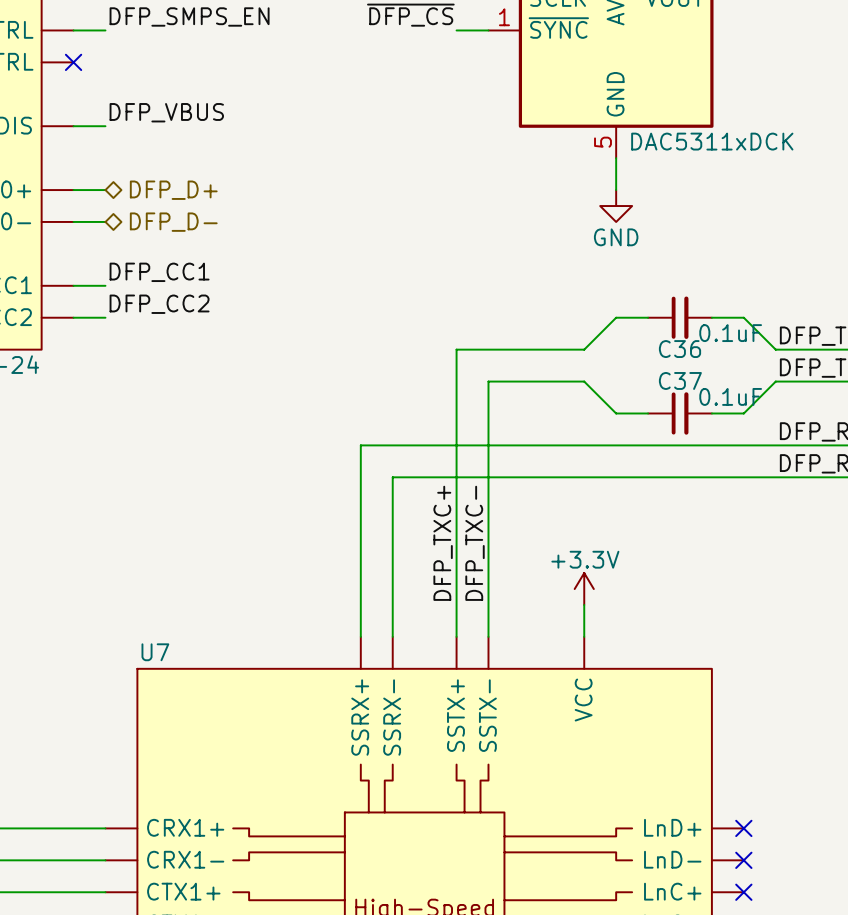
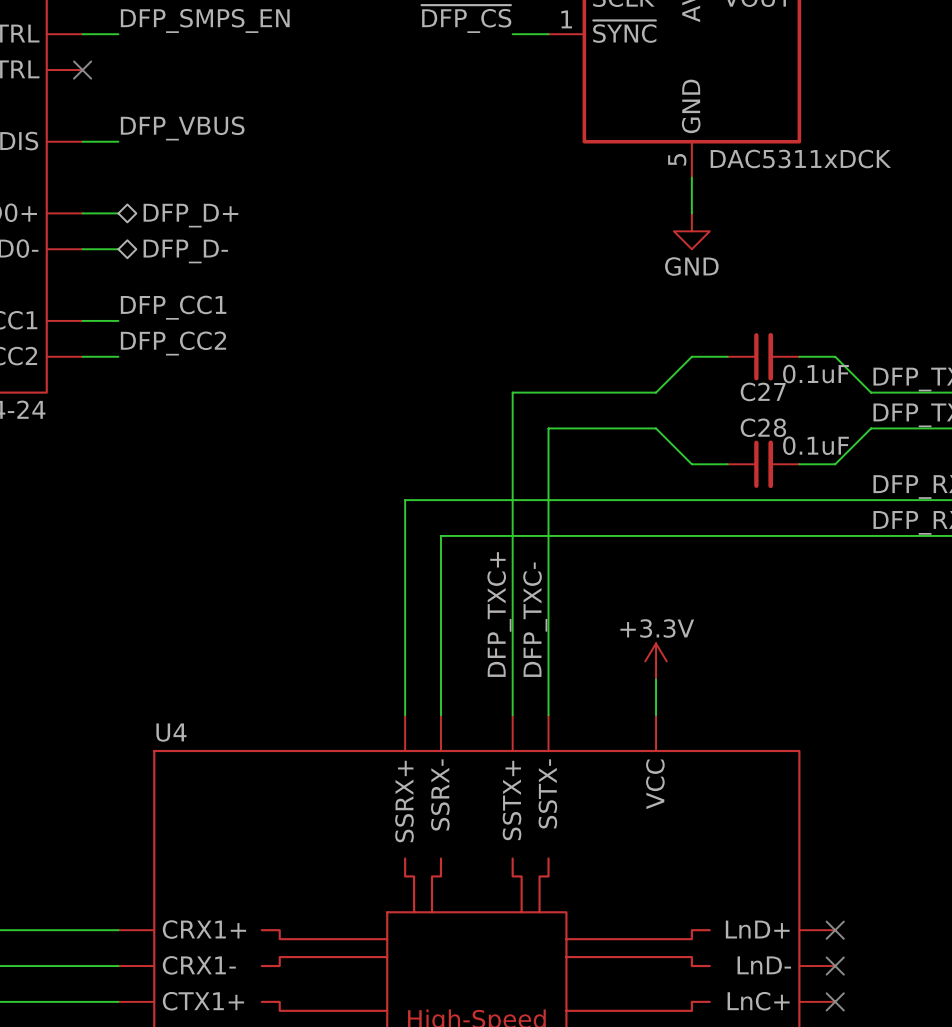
C36 name: C36 (680, 349) -> C27 (763, 391)
C37 name: C37 (680, 380) -> C28 (763, 427)
U7 name: U7 (155, 652) -> U4 (171, 732)

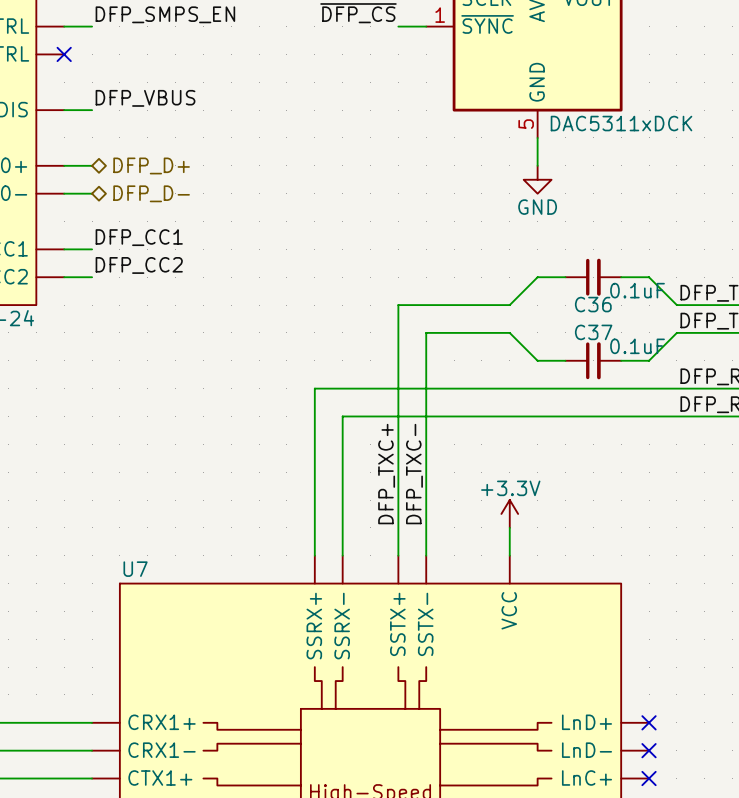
C27 name: C27 (763, 391) -> C36 (593, 304)
C28 name: C28 (763, 427) -> C37 (593, 332)
U4 name: U4 (171, 732) -> U7 (135, 569)

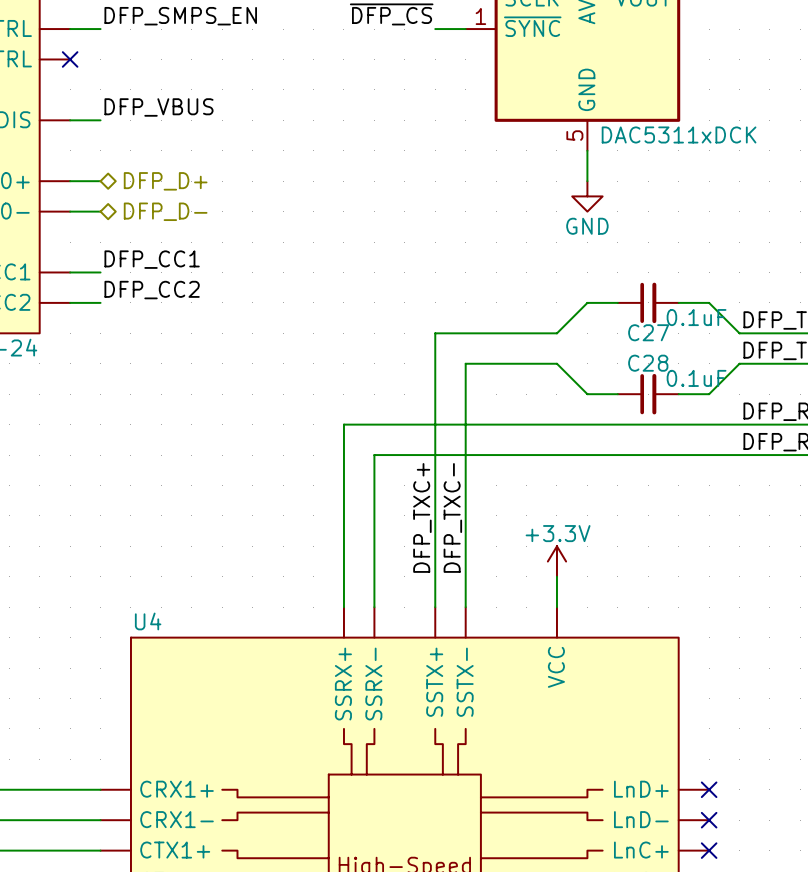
C36 name: C36 (593, 304) -> C27 (648, 332)
C37 name: C37 (593, 332) -> C28 (648, 363)
U7 name: U7 (135, 569) -> U4 (148, 621)

